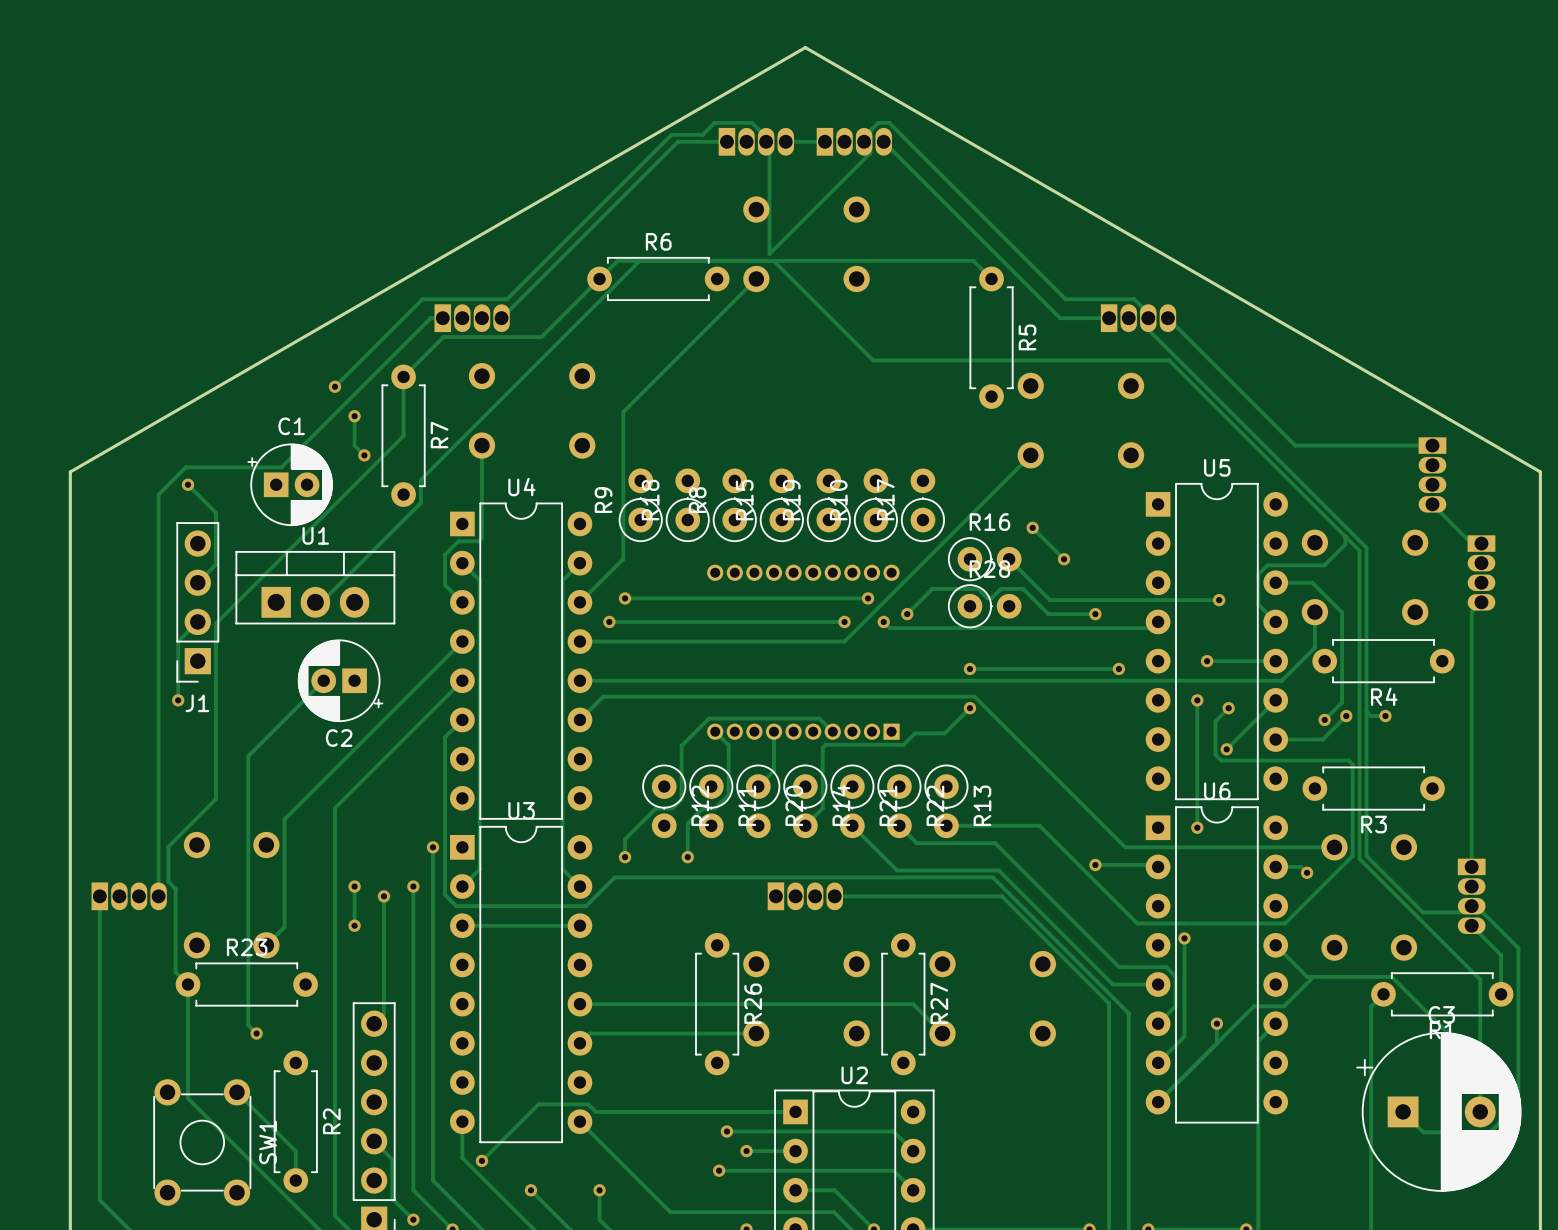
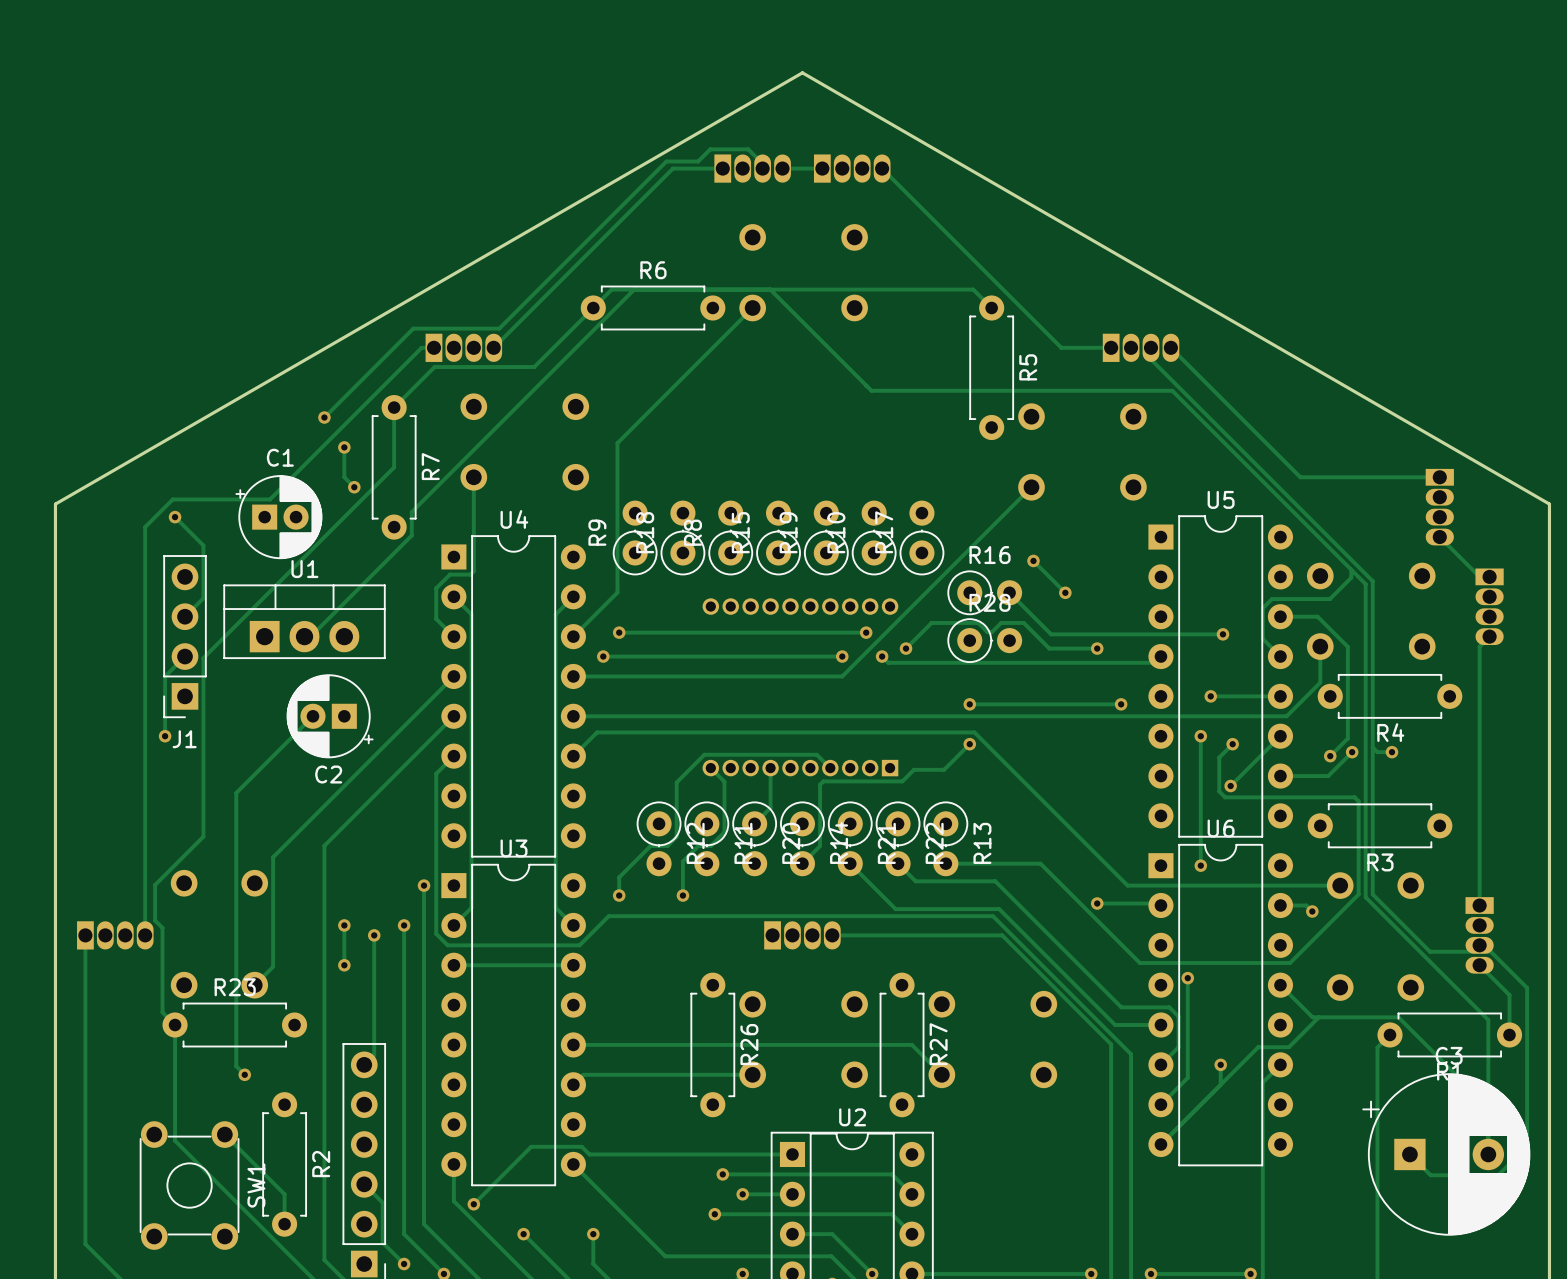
track: (769, 140) (769, 253) (870, 152) (870, 130) (878, 122) (889, 122) (1065, 299) (1134, 299) (1141, 307) (1141, 323) -> none

